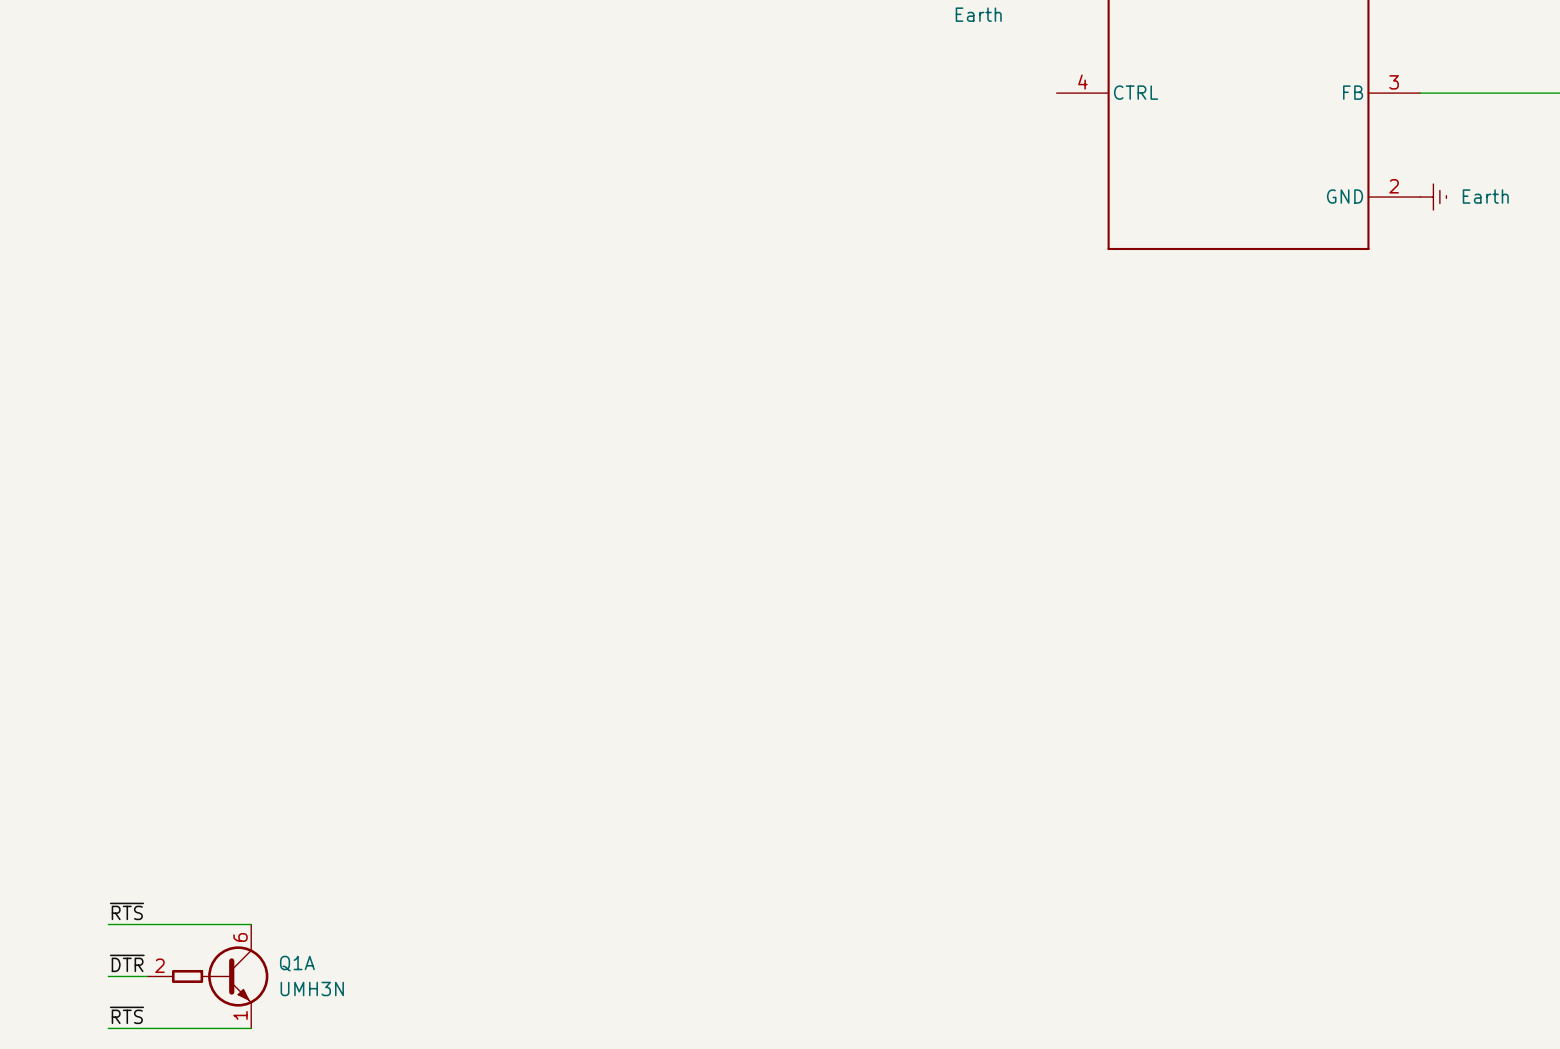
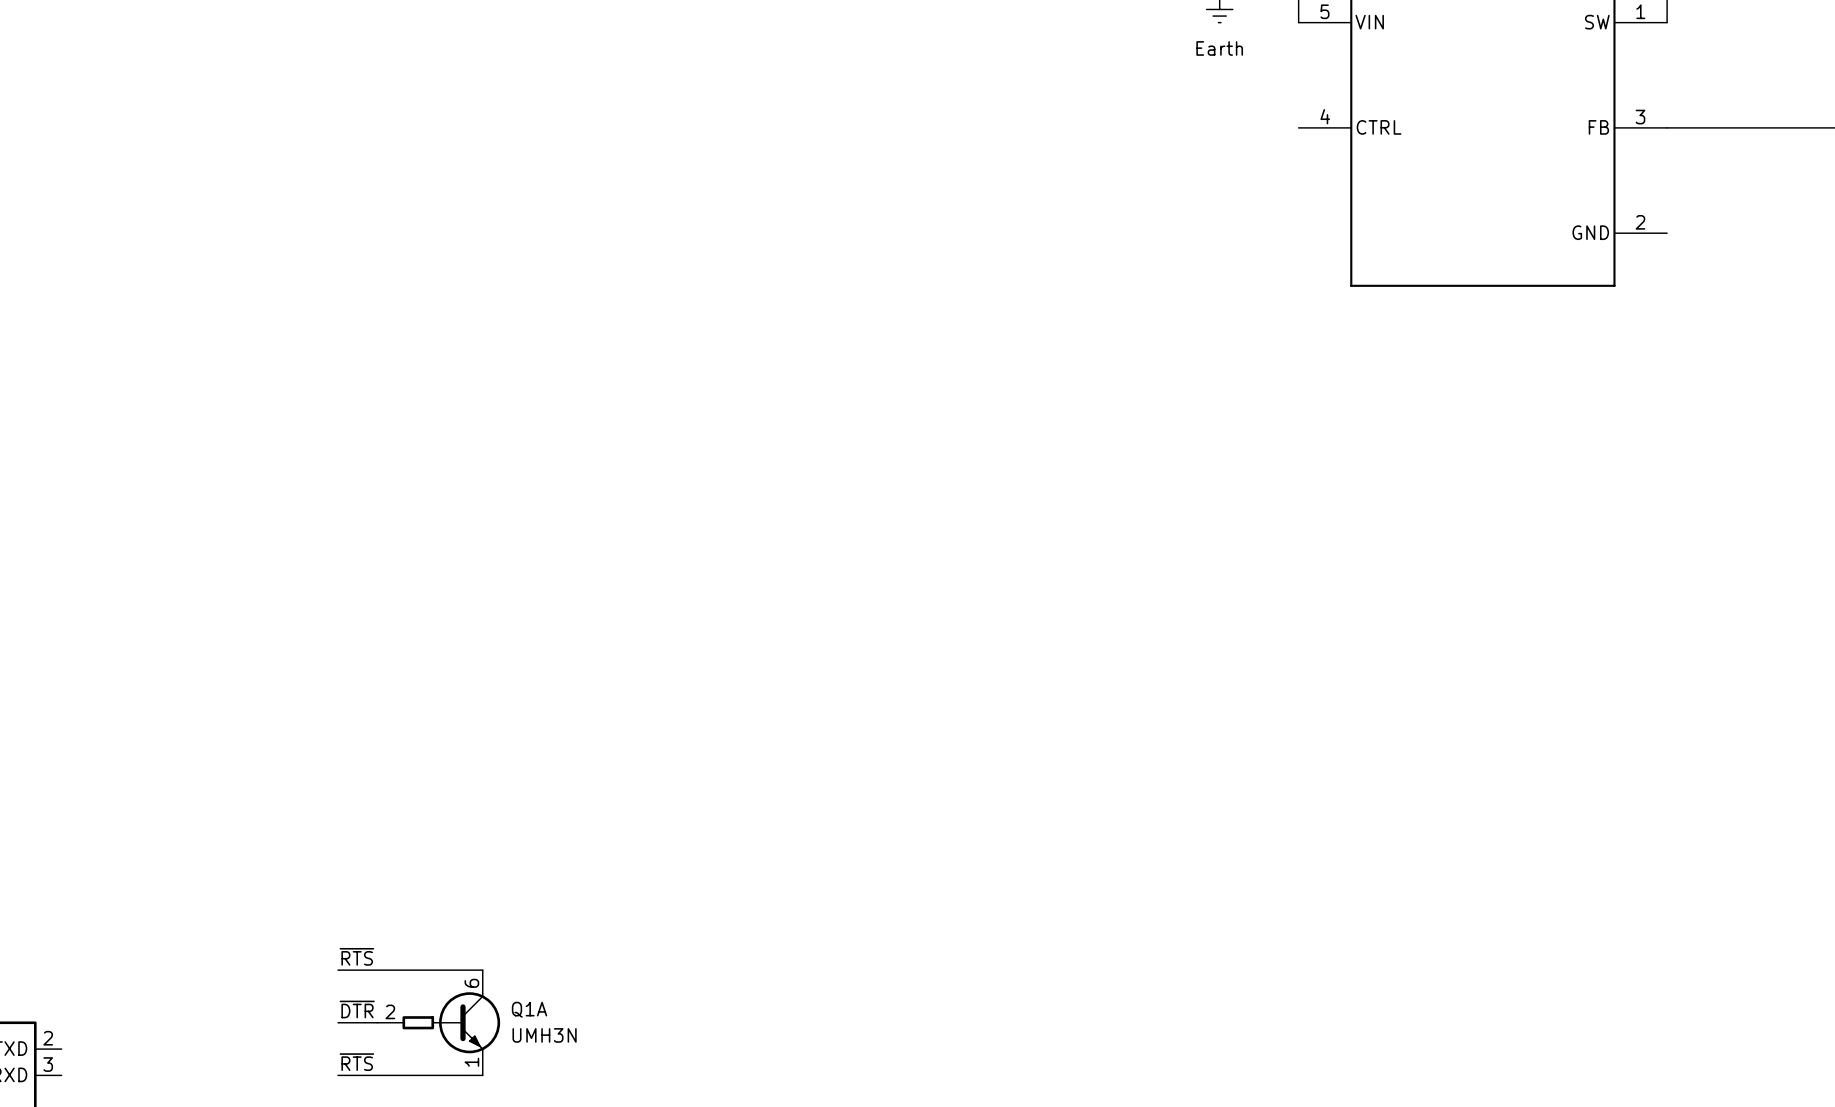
power symbol: Earth (1433, 197) -> none

